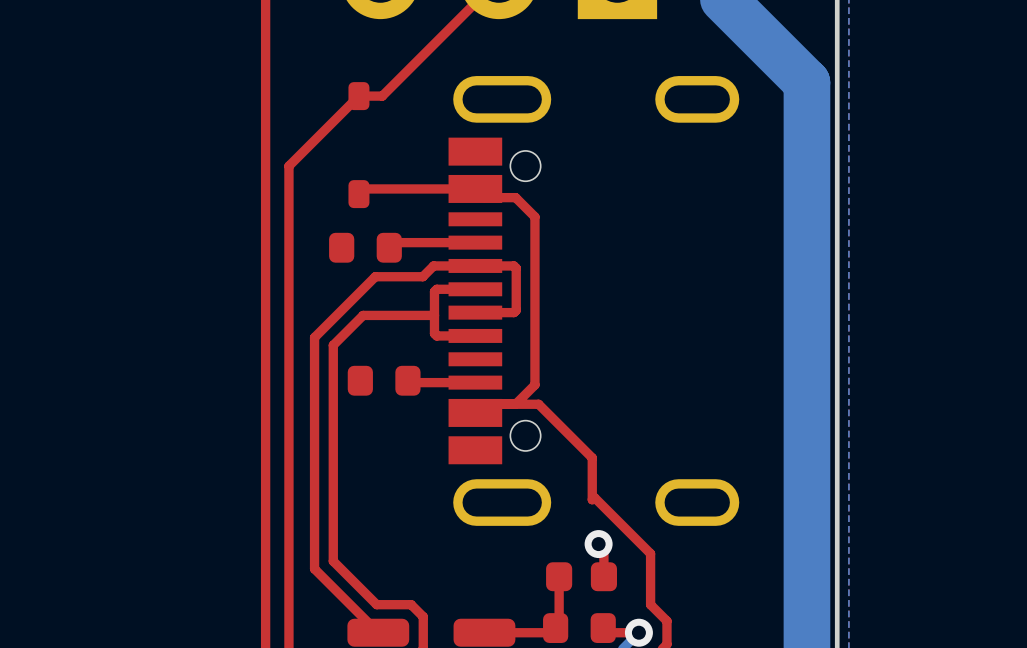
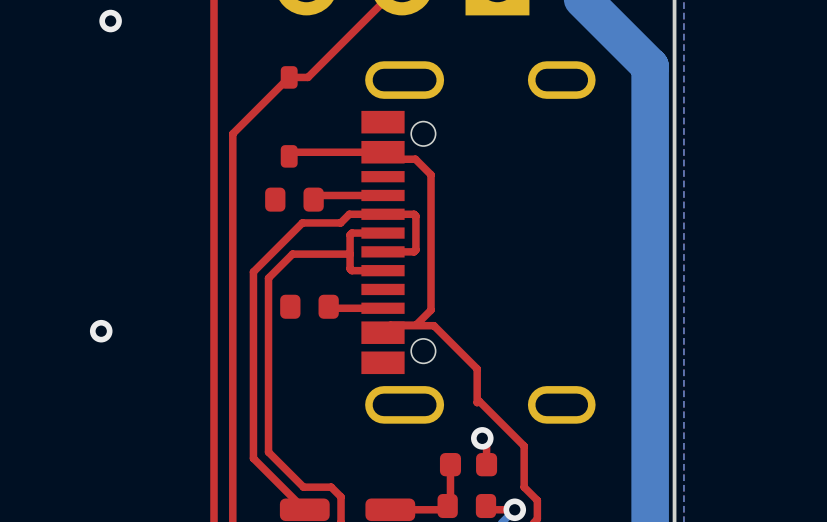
via: none -> (110, 21)
via: none -> (101, 331)

